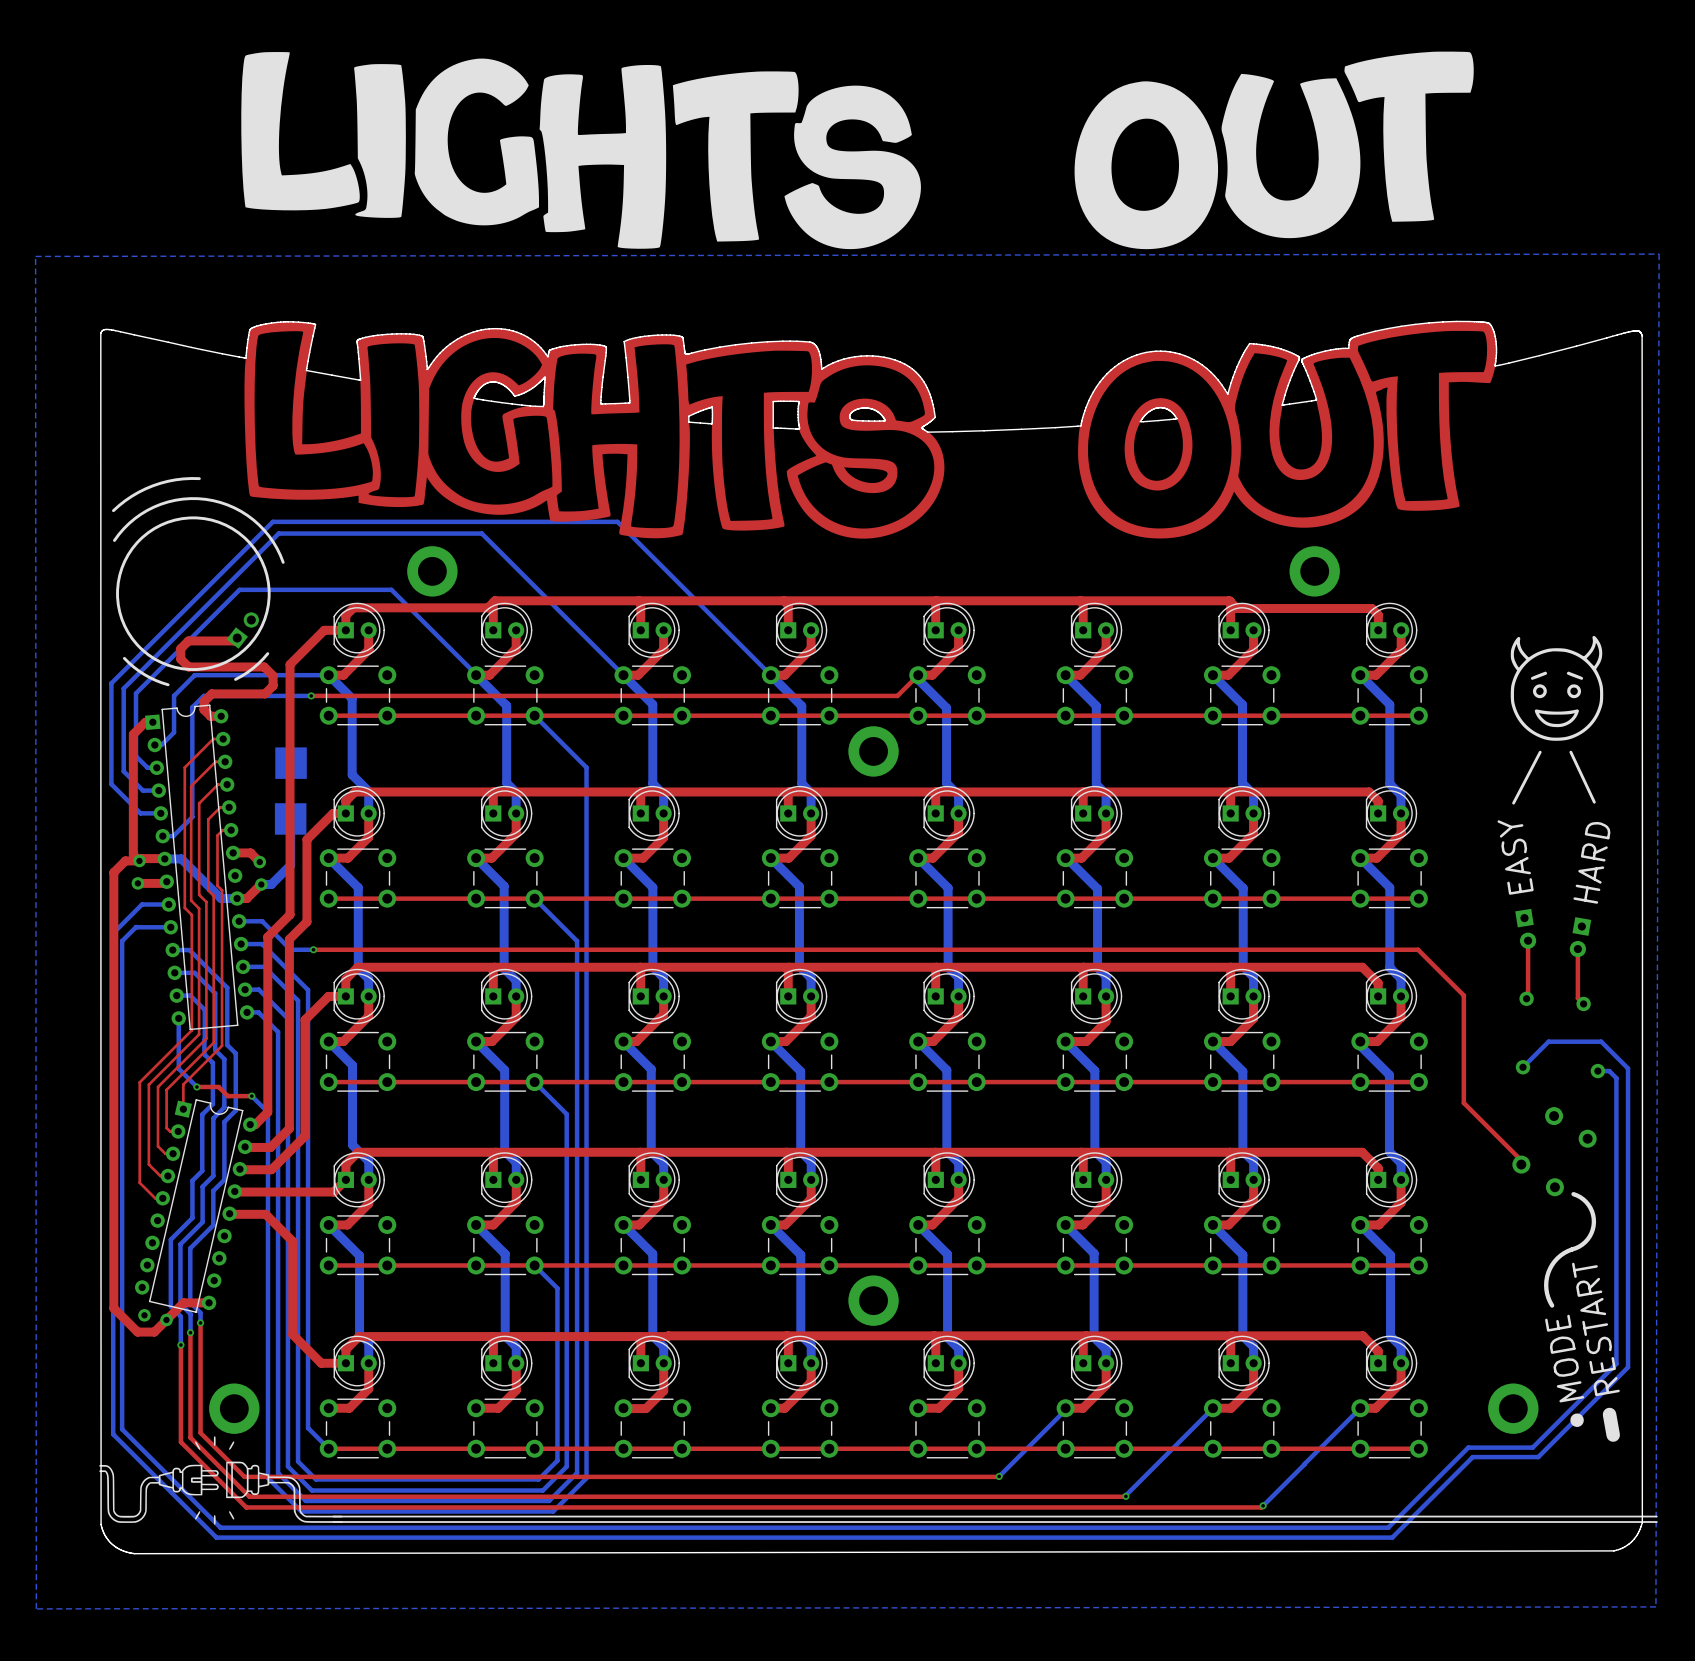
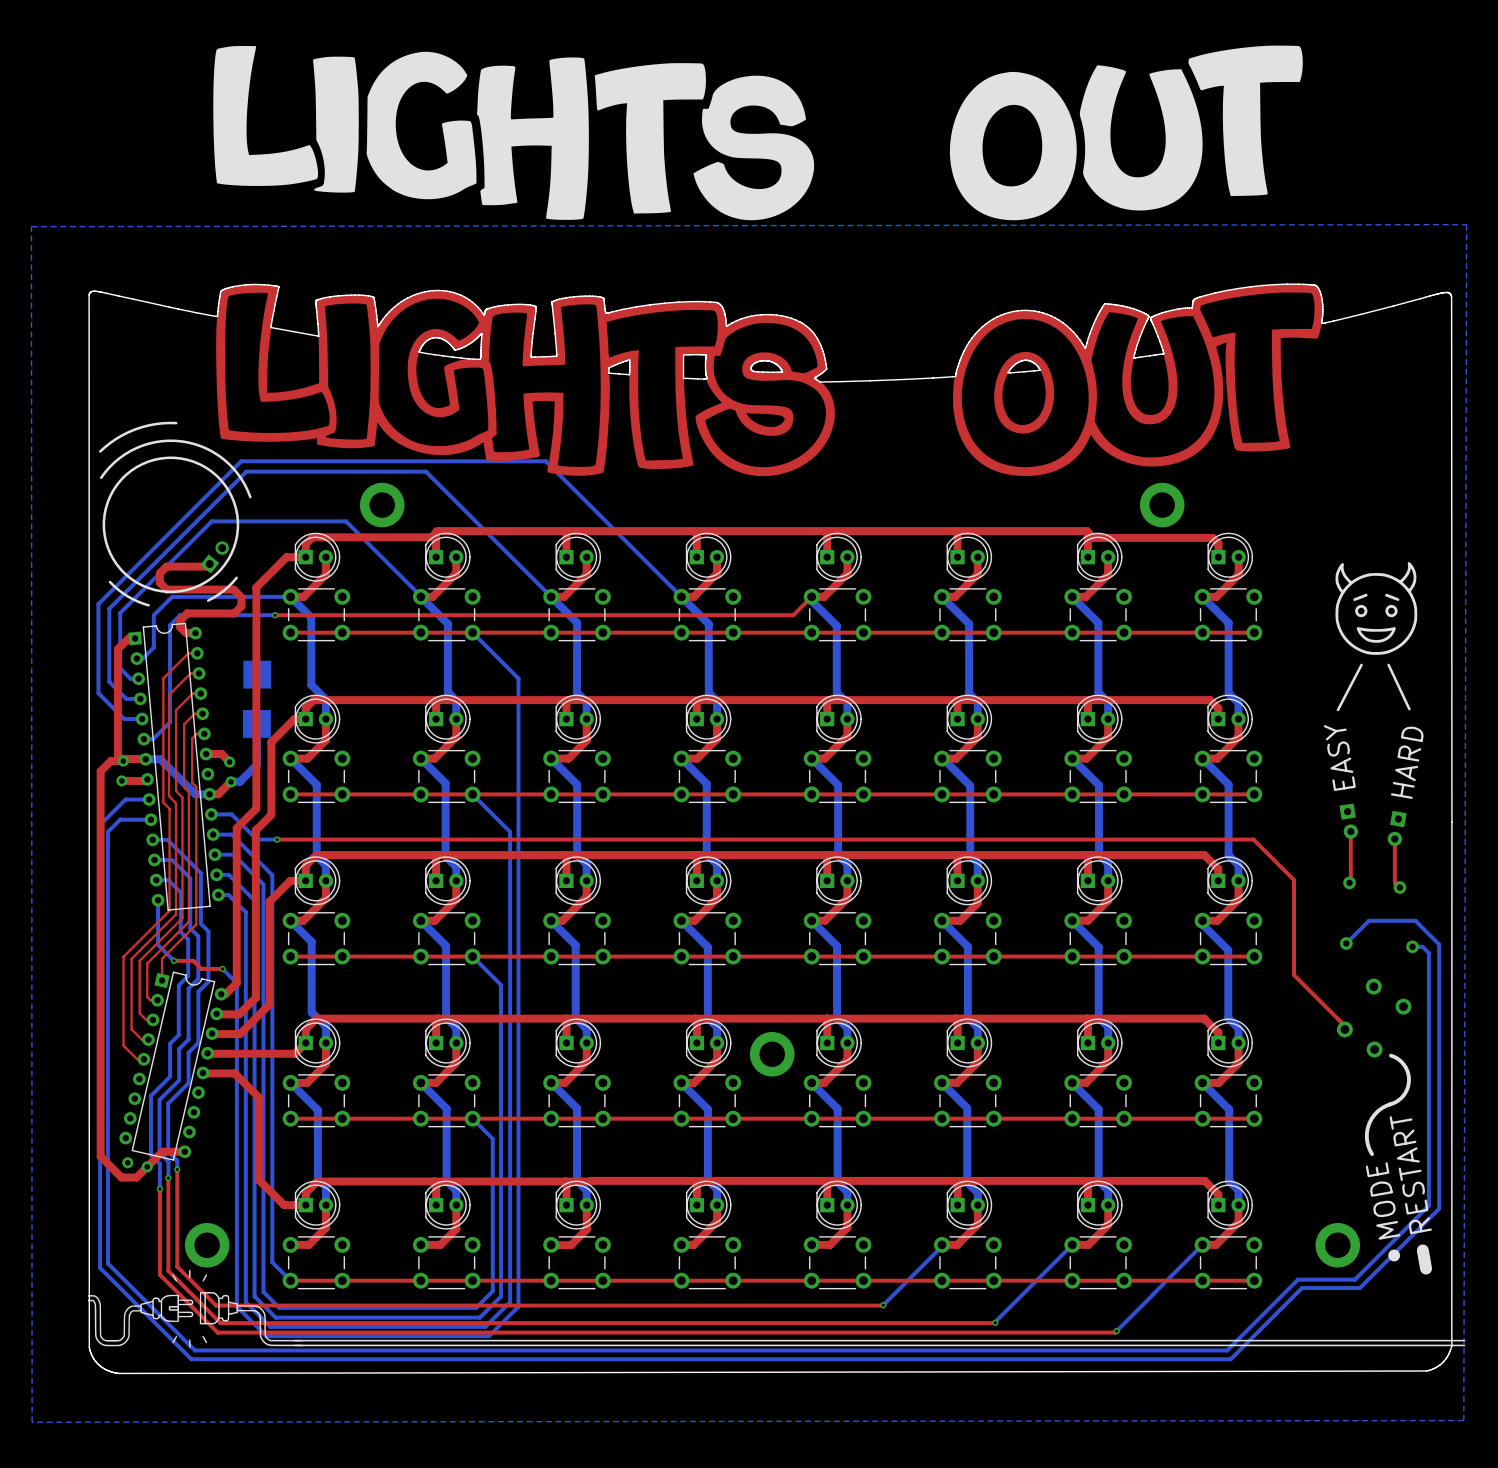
part: (873, 751) -> none
part position: (873, 1300) -> (772, 1054)

